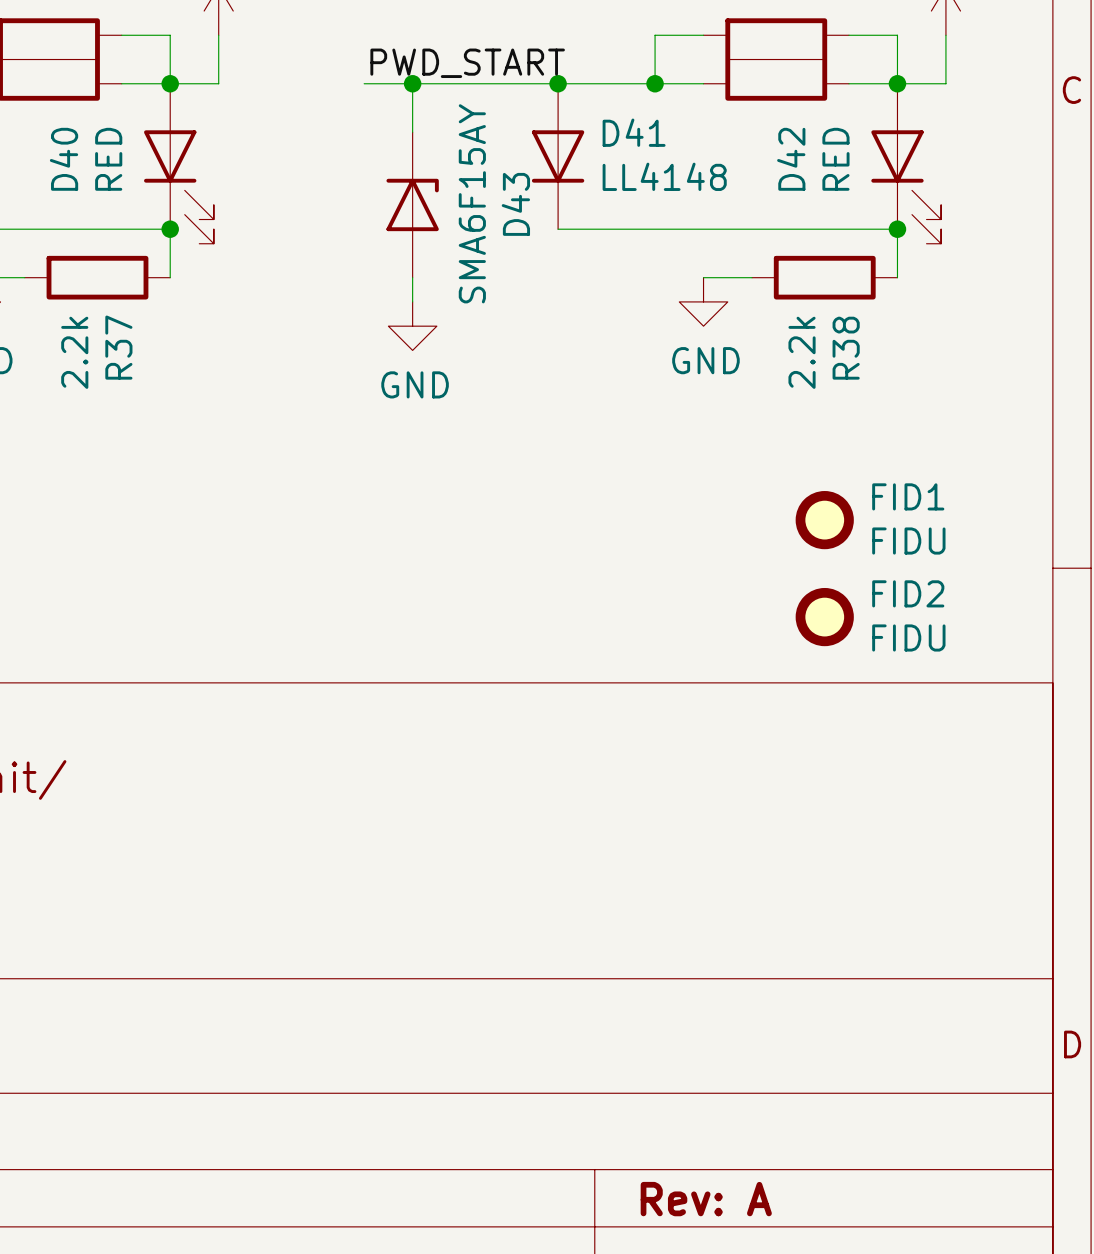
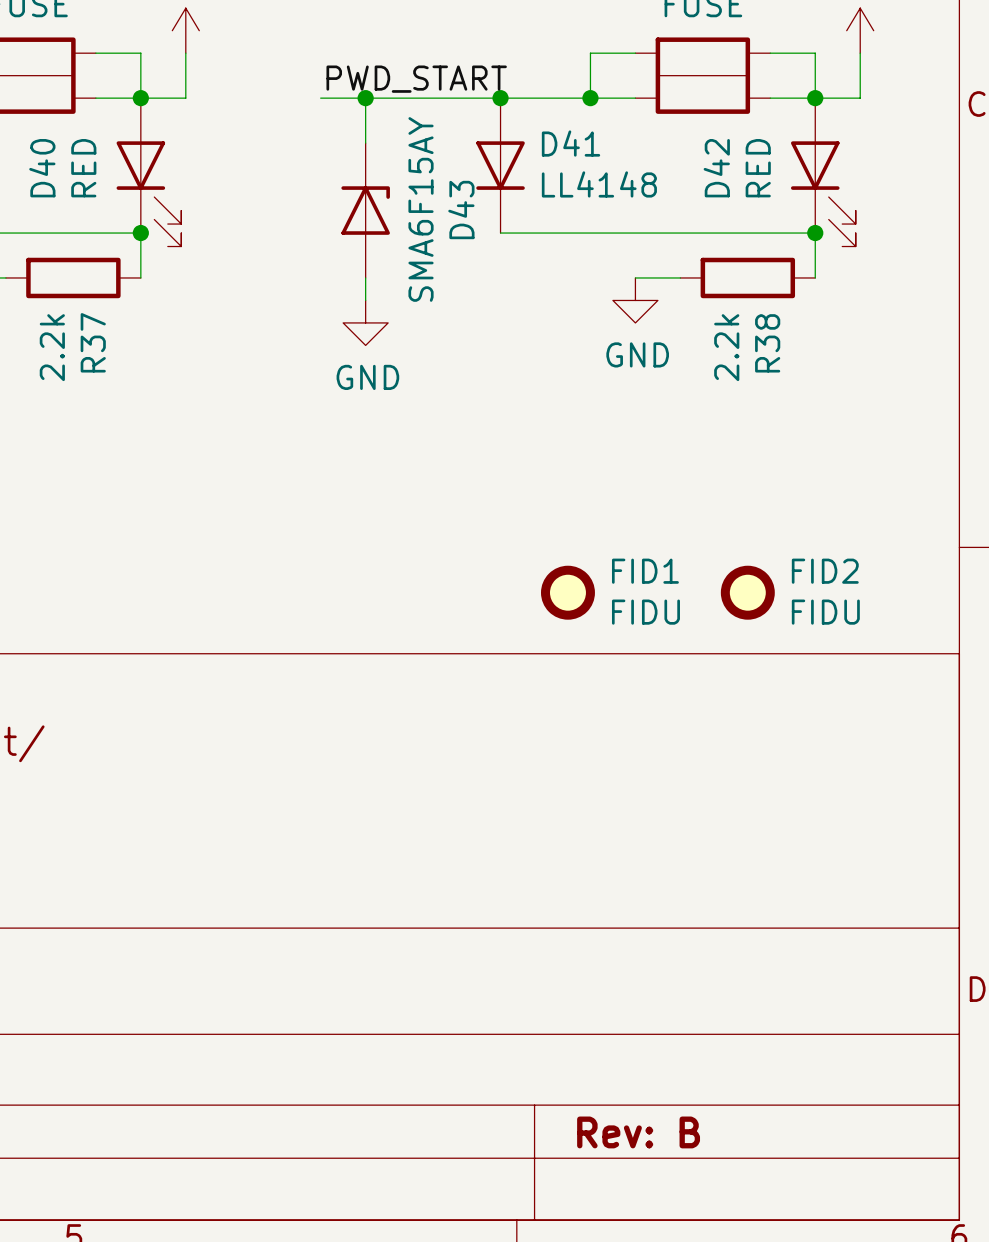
FID1 position: (824, 520) -> (567, 592)
title block: Rev: A (706, 1199) -> Rev: B (638, 1132)

